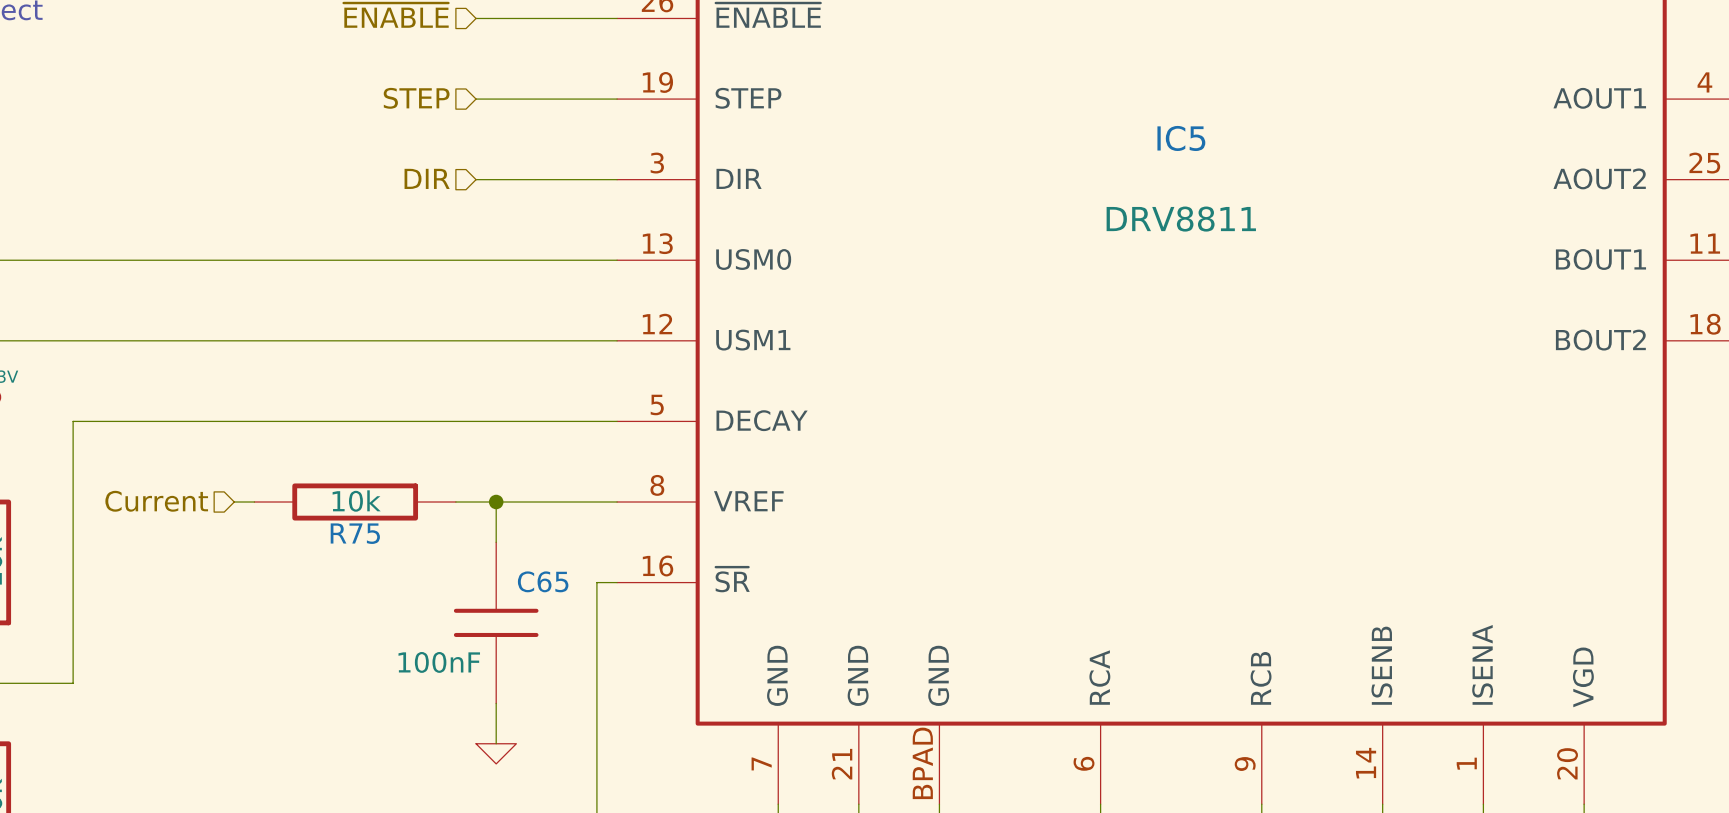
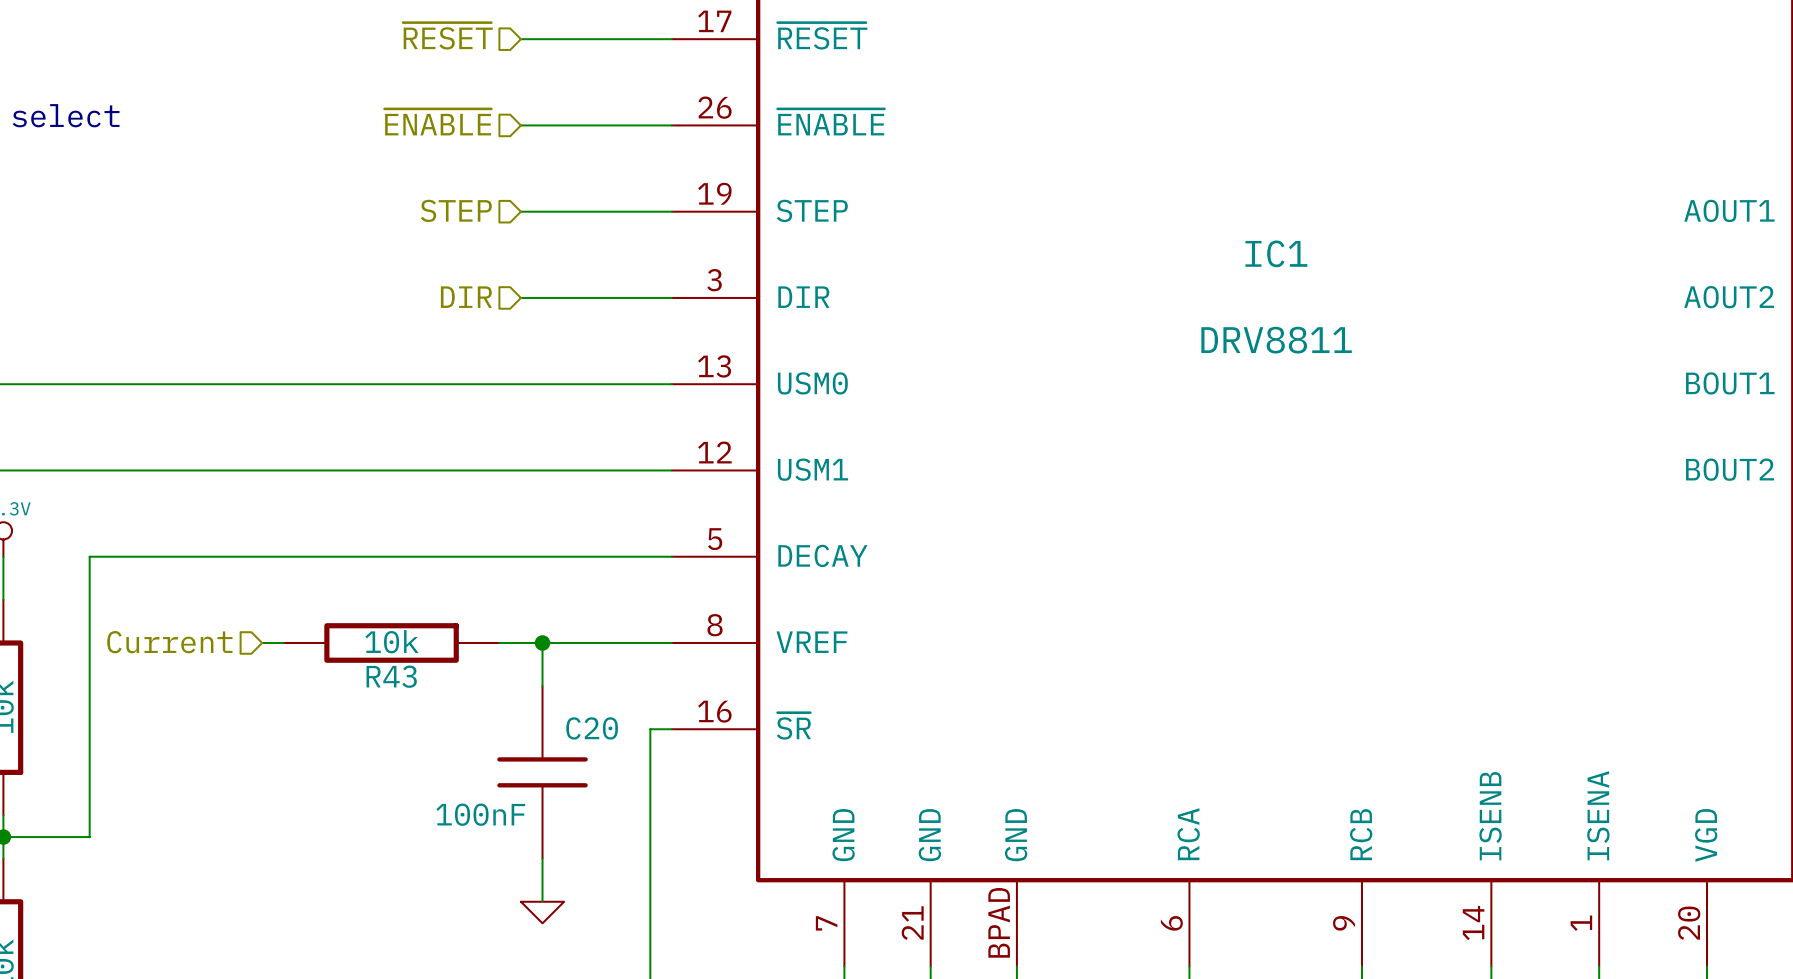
IC5 name: IC5 (1181, 138) -> IC1 (1276, 253)
R75 name: R75 (355, 533) -> R43 (391, 676)
C65 name: C65 (543, 581) -> C20 (592, 728)

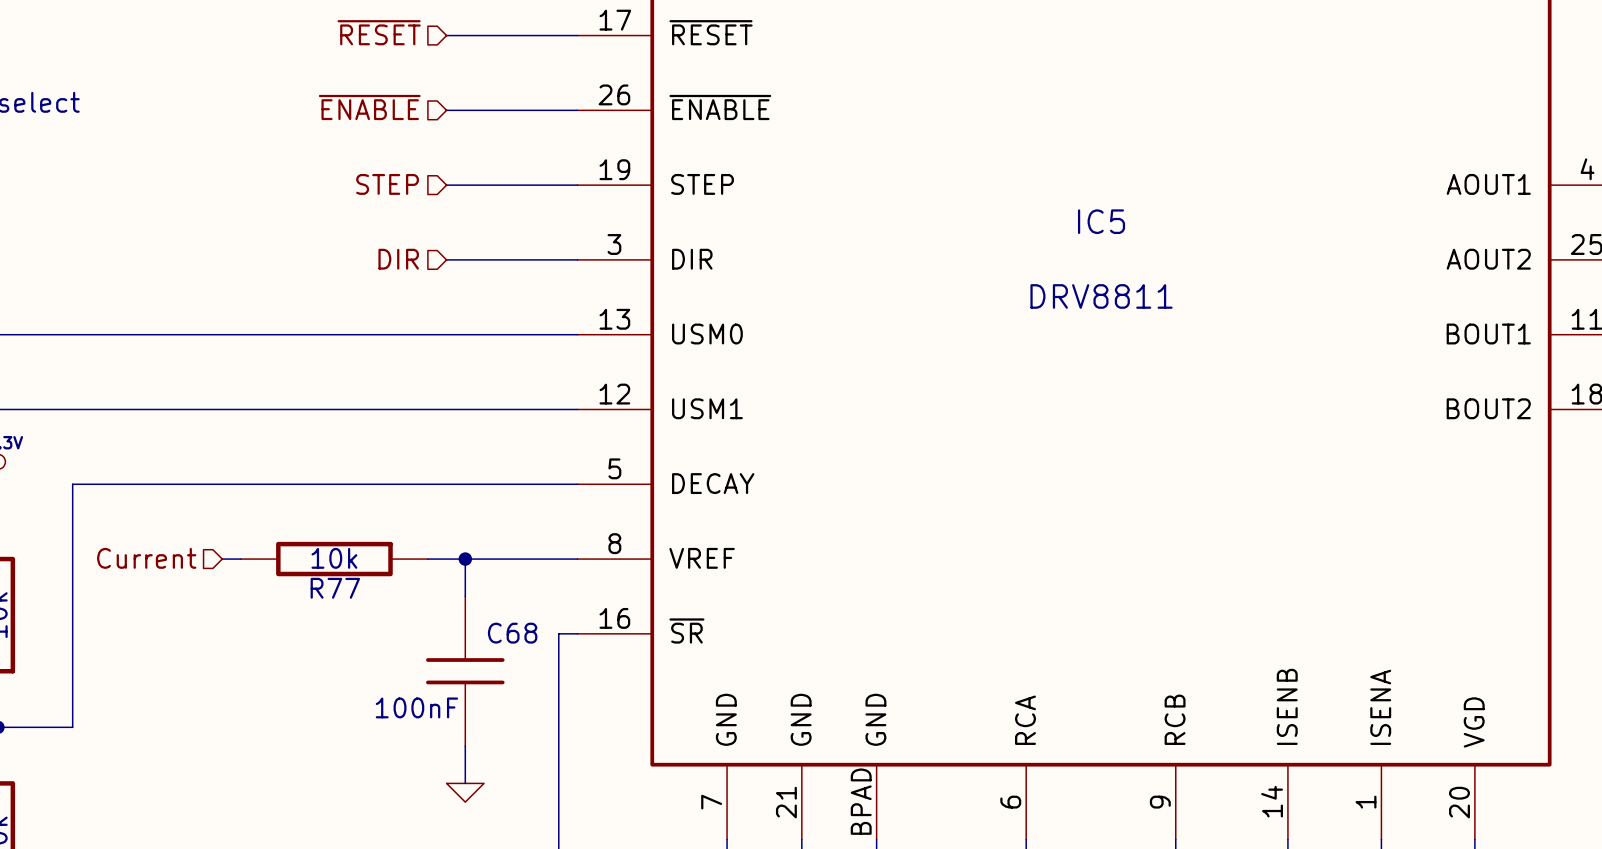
IC1 name: IC1 (1276, 253) -> IC5 (1101, 221)
R43 name: R43 (391, 676) -> R77 (335, 588)
C20 name: C20 (592, 728) -> C68 (512, 633)

